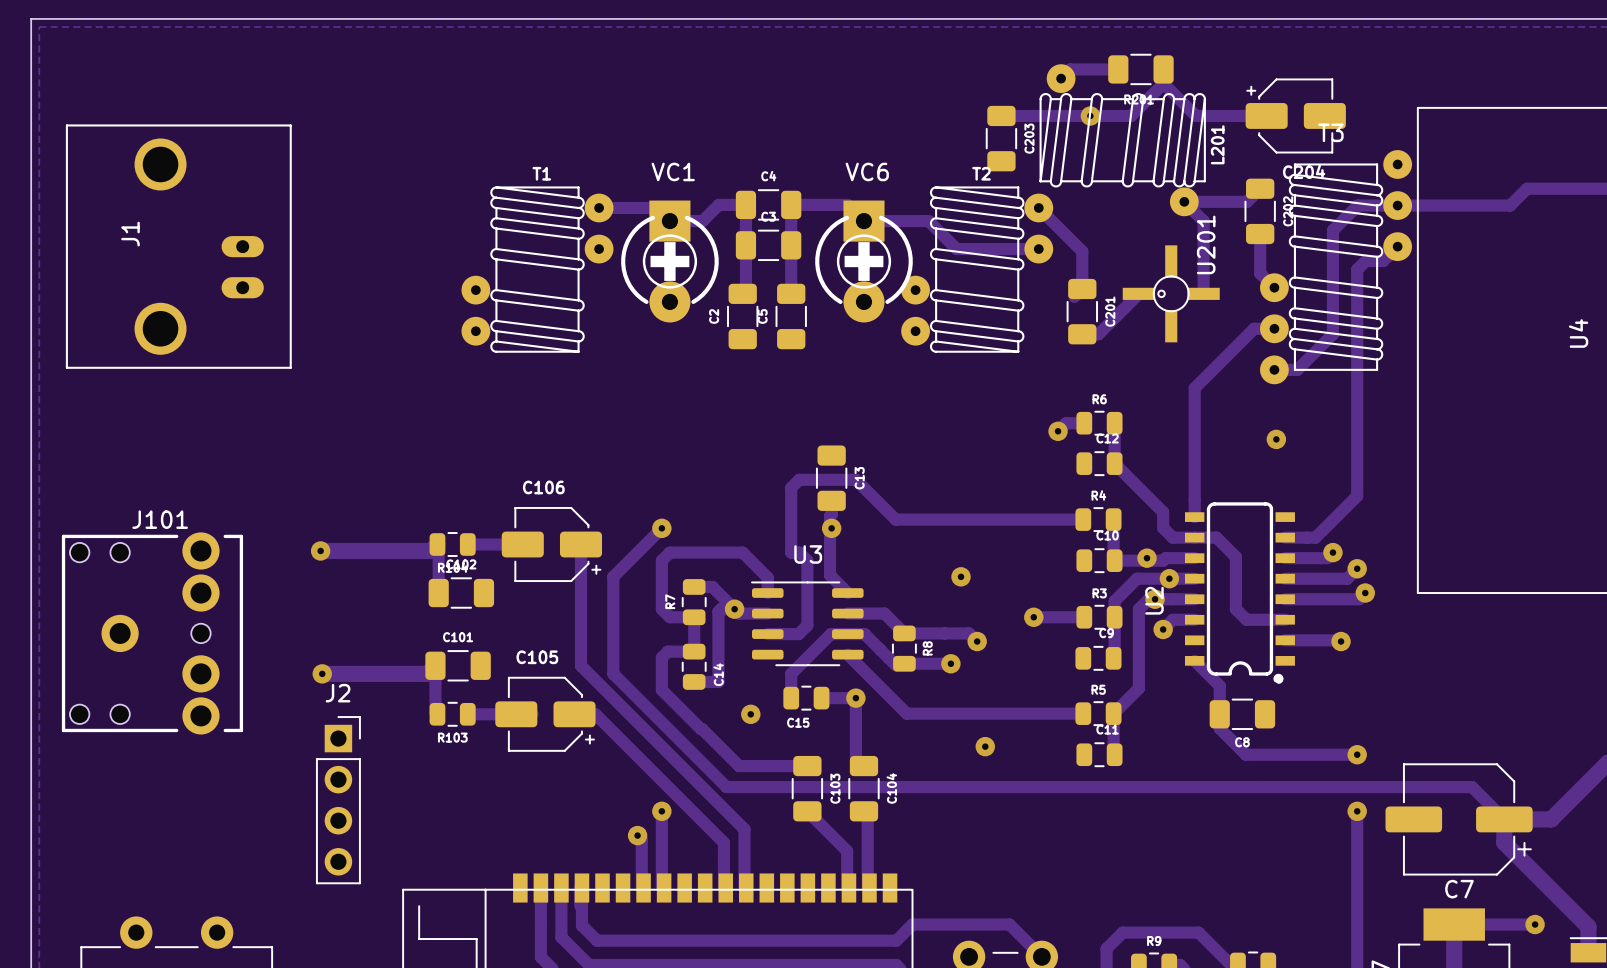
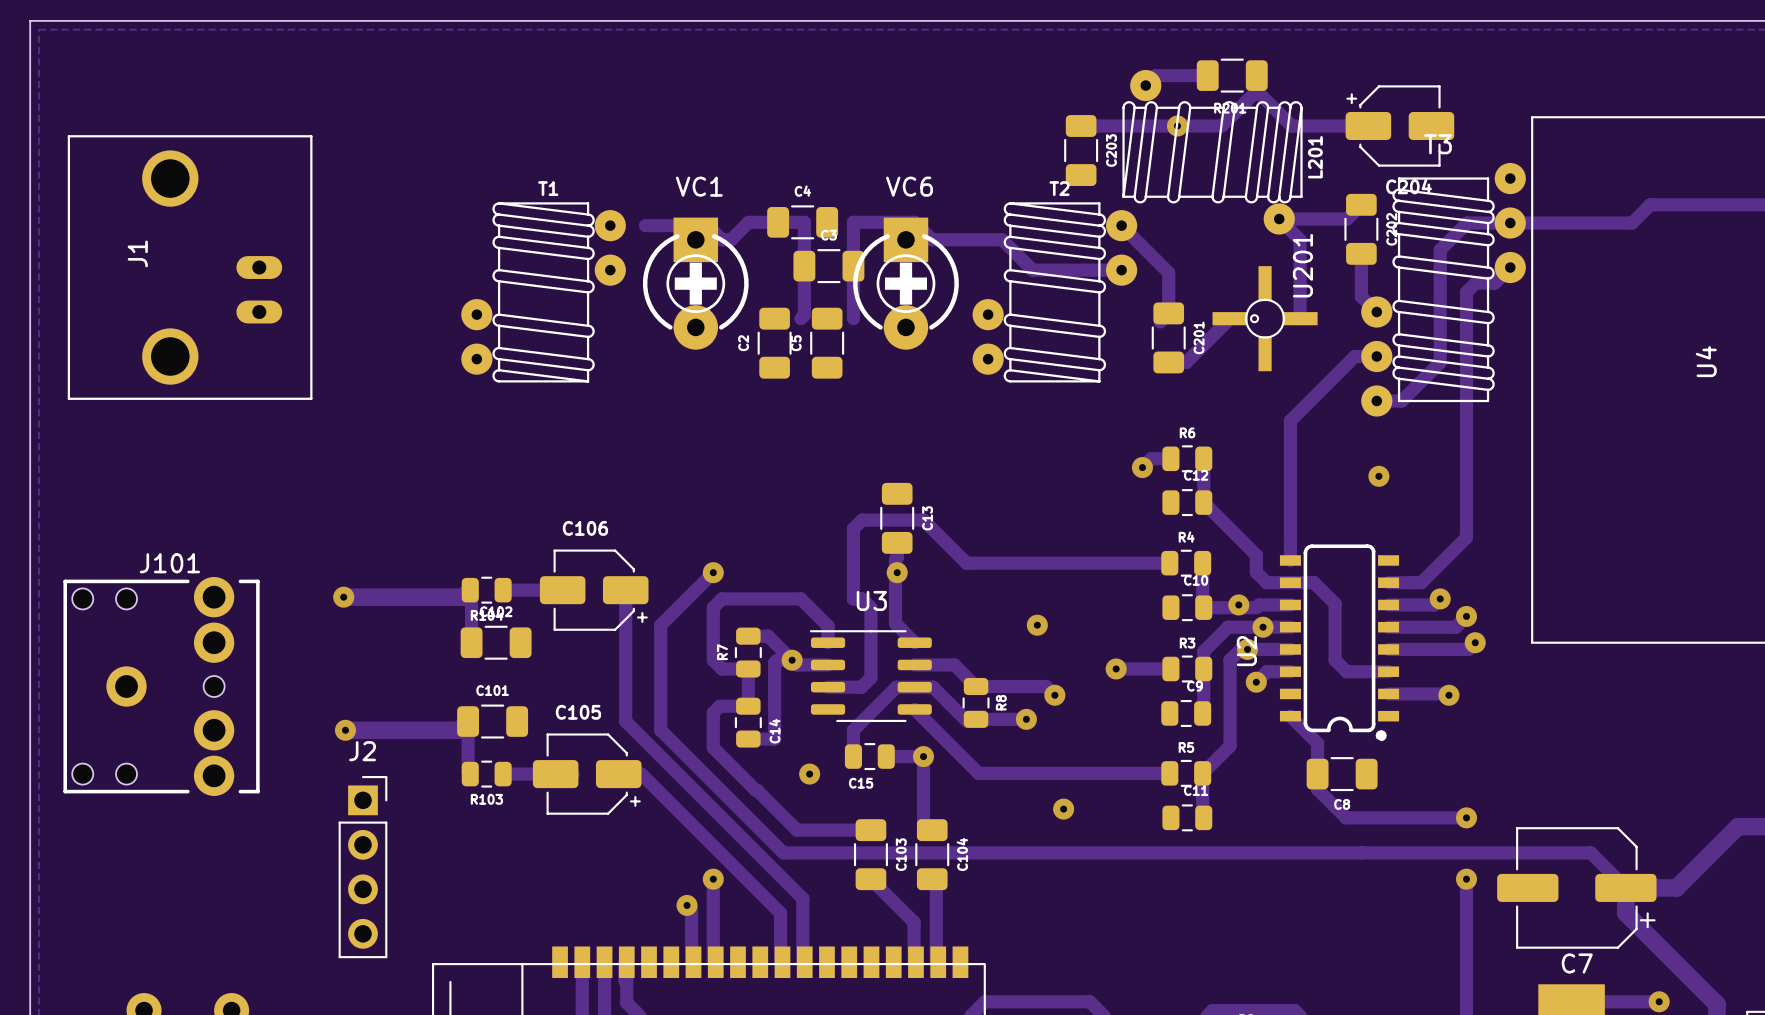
track: (718, 204) (702, 221) (678, 221) -> (774, 222) (748, 222) (731, 239)
C4 position: (768, 204) -> (802, 222)
VC1 position: (669, 261) -> (695, 283)
VC6 position: (863, 261) -> (905, 283)
T1 position: (537, 269) -> (543, 292)
C2 position: (742, 316) -> (774, 343)
C5 position: (791, 316) -> (827, 343)

